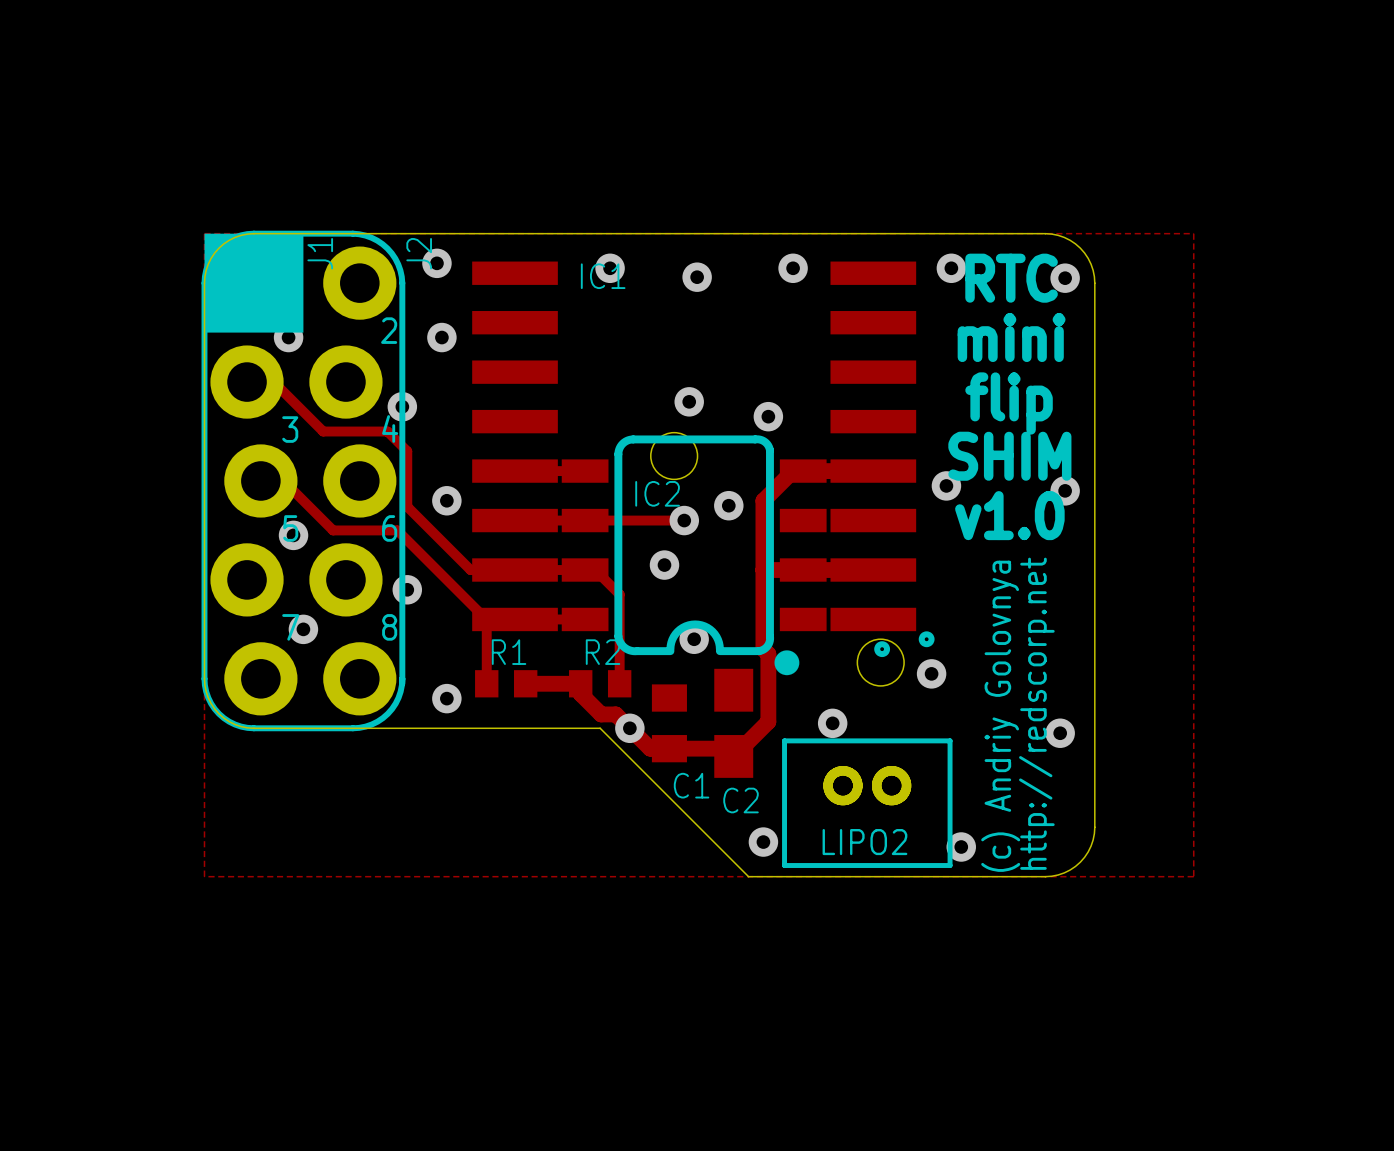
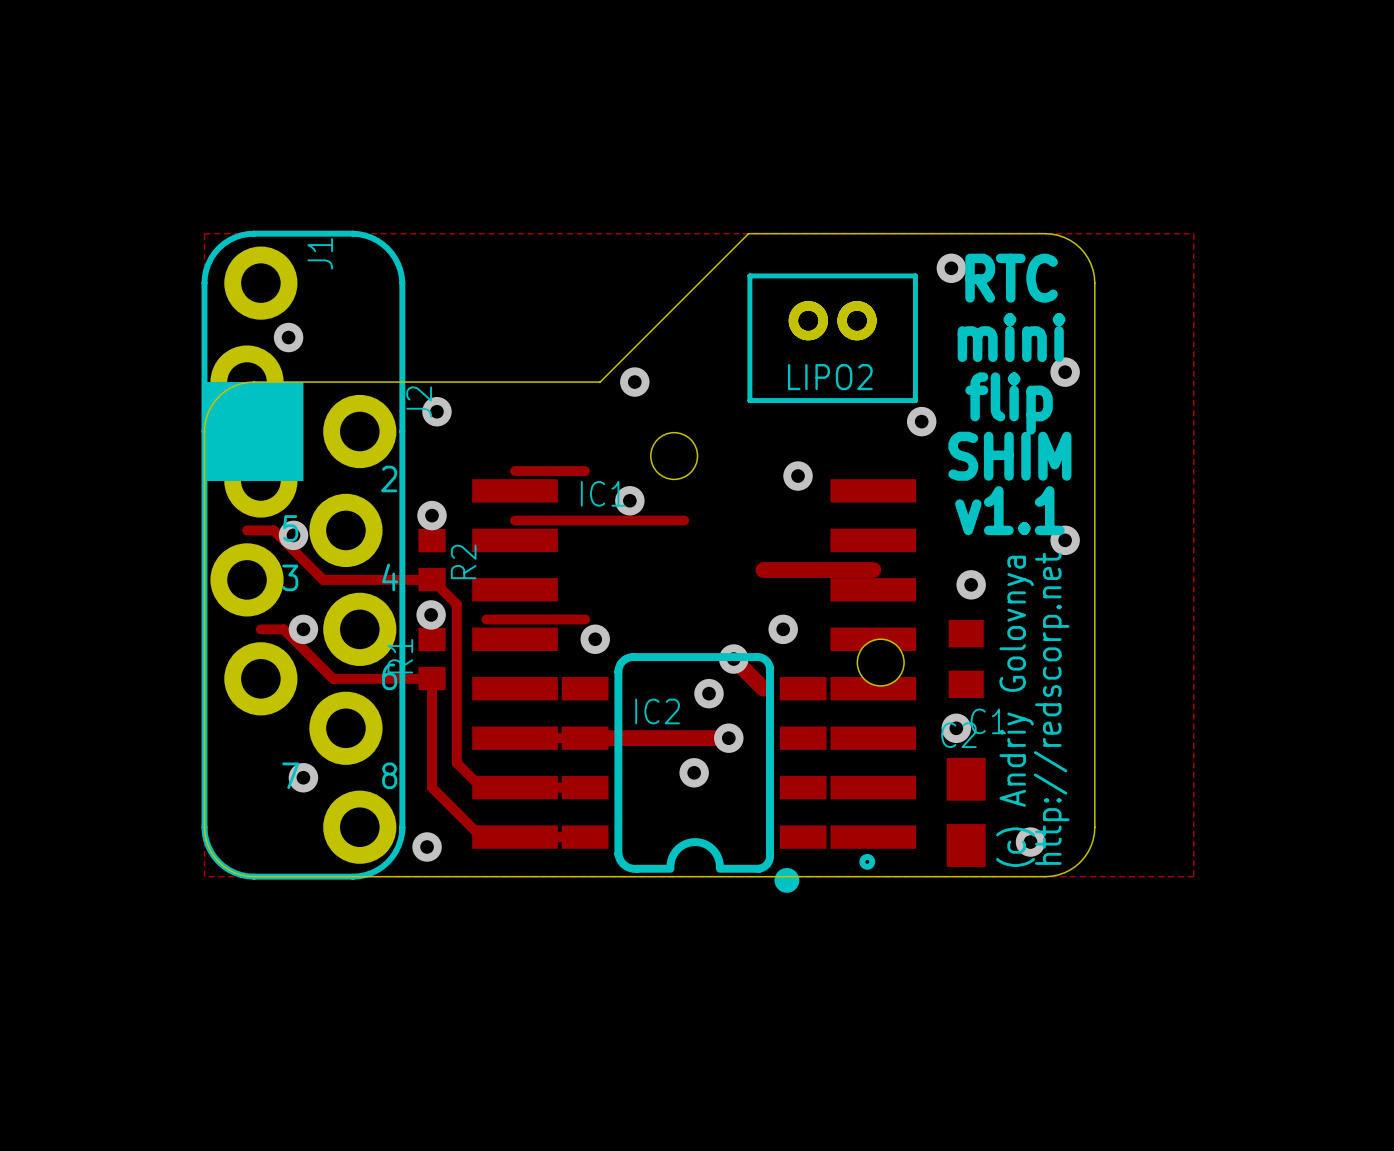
board edge: (748, 233) (253, 233) (235, 237) (223, 243) (214, 253) (208, 264) (204, 276) (204, 431) -> (748, 233) (600, 382) (247, 382) (229, 388) (214, 401) (206, 418) (204, 431)
via: (436, 263) -> none
via: (610, 268) -> none
via: (793, 268) -> none
via: (697, 277) -> none
via: (1065, 278) -> none
drawing position: (253, 283) -> (253, 431)
text position: 2 (389, 330) -> 2 (389, 479)
via: (441, 337) -> none
via: none -> (1065, 372)
track: (247, 382) (273, 382) (323, 431) (387, 431) (407, 451) (407, 506) (470, 570) (595, 570) (619, 594) (619, 683) -> none
via: none -> (634, 382)
via: (689, 401) -> none
via position: (402, 406) -> (436, 411)
via: (768, 416) -> none
via: none -> (921, 421)
text position: 4 (390, 428) -> 4 (390, 577)
text position: 3 (290, 429) -> 3 (290, 577)
IC1 position: (694, 446) -> (694, 663)
track: (873, 471) (793, 471) (763, 500) (763, 649) (768, 654) (768, 721) (733, 756) (725, 748) (650, 748) (615, 714) (601, 714) (580, 693) (580, 683) (525, 683) -> none
via: none -> (798, 476)
track: (260, 480) (283, 480) (333, 530) (397, 530) (486, 619) (486, 683) -> none
J2 position: (352, 480) -> (352, 629)
via: (946, 485) -> none
via position: (1065, 490) -> (1065, 540)
via position: (446, 500) -> (432, 515)
via: none -> (629, 500)
via: (728, 505) -> none
text: v1.0 (1009, 515) -> v1.1 (1009, 510)
via: (684, 520) -> none
text position: 6 (389, 528) -> 6 (389, 676)
track: none -> (247, 530) (273, 530) (323, 579) (431, 579)
IC2 position: (694, 555) -> (694, 772)
via: (664, 565) -> none
track: none -> (432, 579) (456, 604) (456, 762) (481, 787) (585, 787)
via: none -> (971, 584)
via position: (407, 589) -> (431, 614)
text position: 7 (290, 627) -> 7 (290, 775)
text position: 8 (389, 627) -> 8 (389, 775)
track: none -> (260, 629) (283, 629) (333, 678) (431, 678)
via: none -> (783, 629)
drawing: [874, 631, 935, 658] -> none
via: none -> (595, 639)
via: (694, 639) -> none
track: none -> (733, 659) (763, 688)
via: none -> (733, 659)
via: (931, 673) -> none
board edge: (204, 678) (206, 691) (214, 708) (229, 721) (247, 727) (600, 728) (748, 876) -> (204, 678) (204, 833) (208, 846) (214, 857) (223, 866) (235, 872) (253, 876) (748, 876)
line: (204, 678) (208, 697) (218, 713) (235, 724) (253, 728) (365, 726) (377, 721) (392, 708) (400, 691) (402, 678) -> (204, 678) (204, 833) (211, 851) (223, 866) (241, 874) (253, 876) (365, 874) (377, 870) (392, 857) (400, 840) (402, 827)
track: none -> (432, 678) (432, 787) (481, 837) (585, 837)
line: none -> (402, 683) (402, 832)
R1 rotation: 0° (506, 683) -> 90° clockwise (432, 659)
R1 position: (506, 683) -> (432, 659)
R2 rotation: 0° (600, 683) -> 90° clockwise (432, 560)
R2 position: (600, 683) -> (432, 560)
via: none -> (709, 693)
via: (446, 698) -> none
text position: http://redscorp.net (1036, 713) -> http://redscorp.net (1051, 708)
text position: (c) Andriy Golovnya (1000, 716) -> (c) Andriy Golovnya (1015, 711)
C1 position: (669, 723) -> (966, 659)
C2 position: (733, 723) -> (966, 812)
via: (832, 723) -> none
via: (629, 728) -> none
via: none -> (956, 728)
via: (1060, 733) -> none
track: none -> (515, 738) (728, 738)
via: none -> (728, 738)
via: none -> (694, 772)
via: none -> (303, 777)
part position: (867, 785) -> (832, 320)
C2 name position: C2 (741, 800) -> C2 (958, 735)
LIPO2 position: (867, 803) -> (832, 338)
via: (763, 842) -> none
via: none -> (1030, 842)
via: none -> (427, 847)
via: (961, 847) -> none
drawing: none -> [859, 853, 876, 870]

